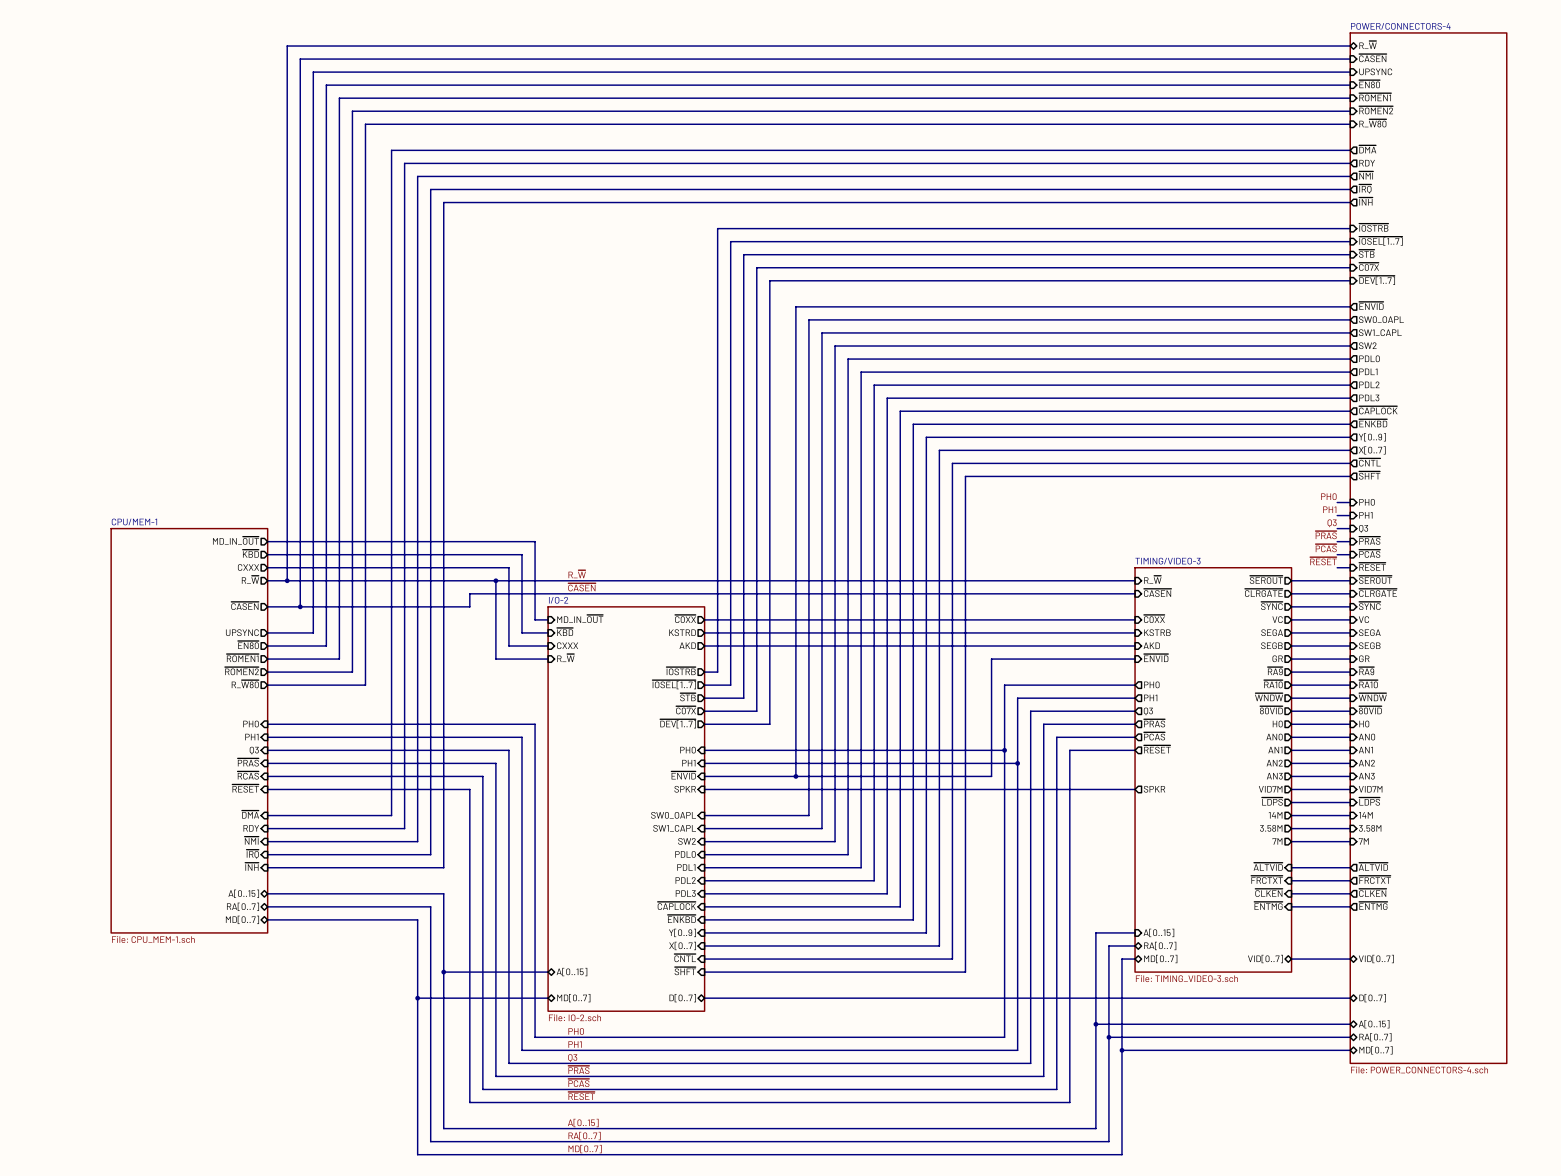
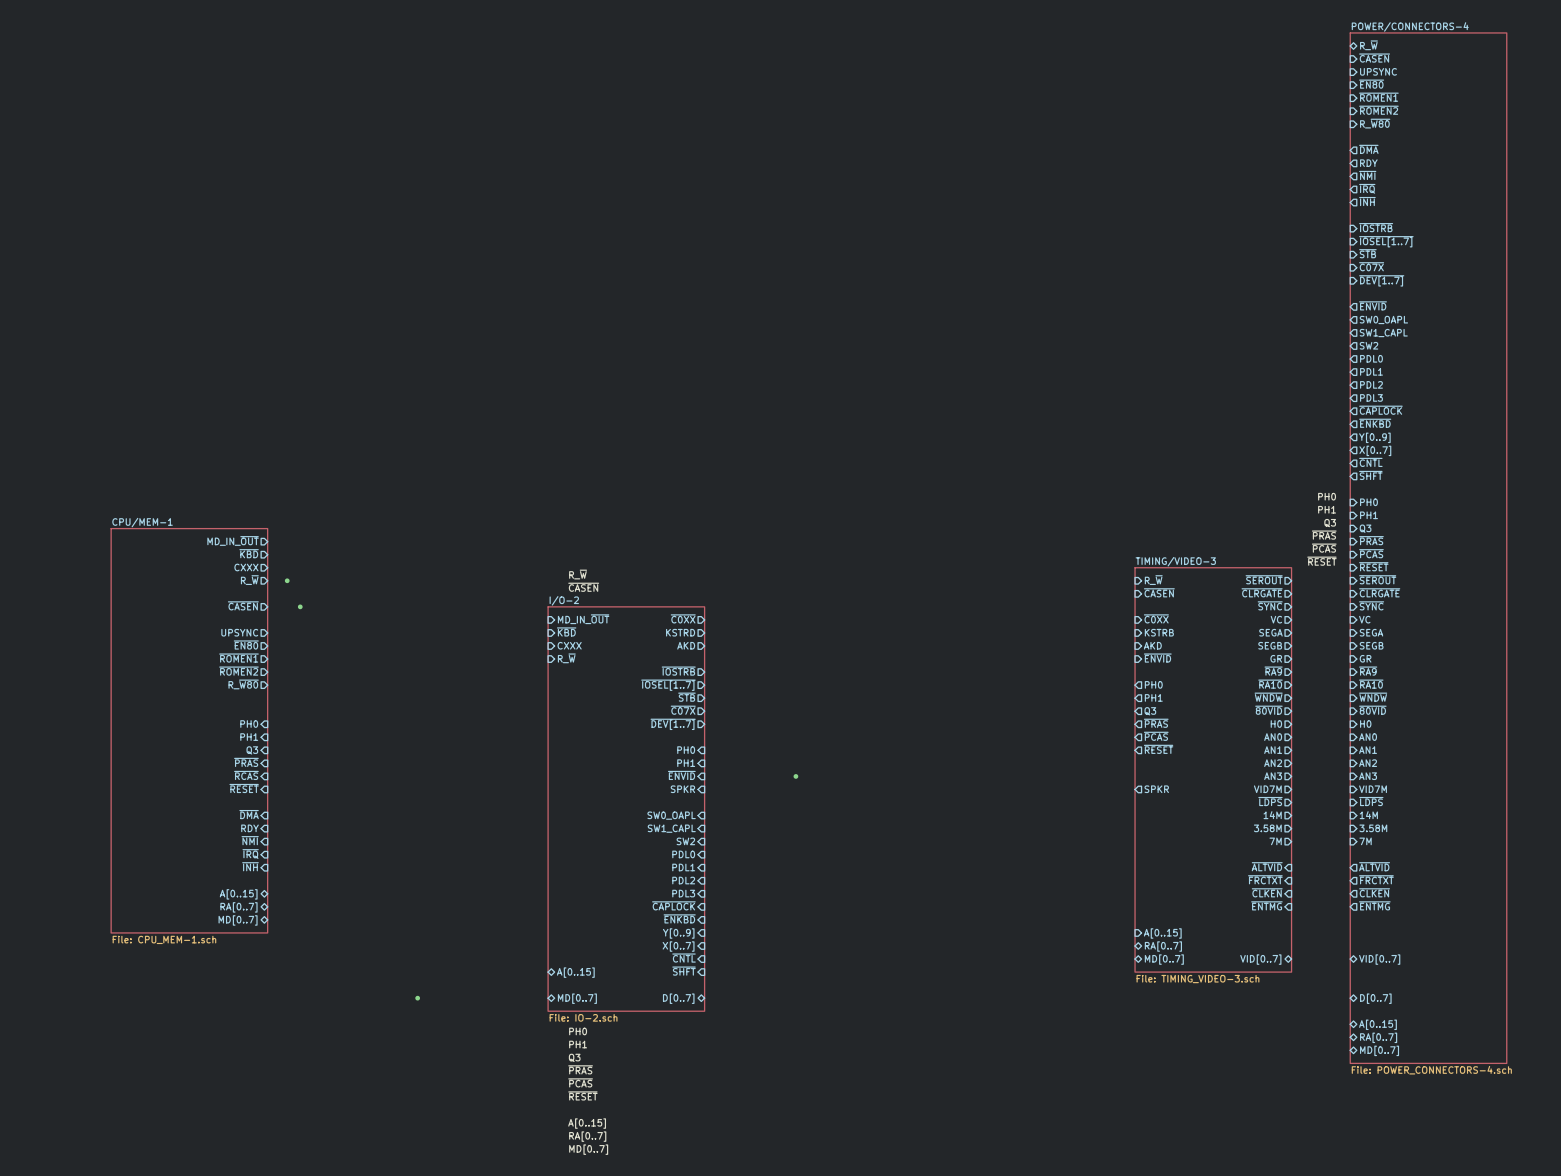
wire: (1350, 46) (287, 46) (287, 580) -> none
wire: (1350, 59) (300, 59) (300, 606) -> none
wire: (1350, 72) (313, 72) (313, 632) (267, 632) -> none
wire: (1350, 85) (326, 85) (326, 646) (267, 646) -> none
wire: (1350, 98) (339, 98) (339, 659) (267, 659) -> none
wire: (1350, 111) (352, 111) (352, 672) (267, 672) -> none
wire: (1350, 124) (365, 124) (365, 685) (267, 685) -> none
wire: (1350, 150) (391, 150) (391, 815) (267, 815) -> none
wire: (1350, 163) (404, 163) (404, 828) (267, 828) -> none
wire: (1350, 176) (417, 176) (417, 841) (267, 841) -> none
wire: (1350, 189) (430, 189) (430, 854) (267, 854) -> none
wire: (1350, 202) (443, 202) (443, 867) (267, 867) -> none
wire: (1350, 228) (717, 228) (717, 672) (704, 672) -> none
bus: (1350, 241) (730, 241) (730, 685) (704, 685) -> none
wire: (1350, 254) (743, 254) (743, 698) (704, 698) -> none
wire: (1350, 267) (756, 267) (756, 711) (704, 711) -> none
bus: (1350, 280) (769, 280) (769, 724) (704, 724) -> none
wire: (1350, 306) (795, 306) (795, 776) -> none
wire: (1350, 319) (808, 319) (808, 815) (704, 815) -> none
wire: (1350, 332) (821, 332) (821, 828) (704, 828) -> none
wire: (1350, 346) (835, 346) (835, 841) (704, 841) -> none
wire: (1350, 359) (848, 359) (848, 854) (704, 854) -> none
wire: (1350, 372) (861, 372) (861, 867) (704, 867) -> none
wire: (1350, 385) (874, 385) (874, 880) (704, 880) -> none
wire: (1350, 398) (887, 398) (887, 893) (704, 893) -> none
wire: (1350, 411) (900, 411) (900, 906) (704, 906) -> none
wire: (1350, 424) (913, 424) (913, 919) (704, 919) -> none
bus: (1350, 437) (926, 437) (926, 932) (704, 932) -> none
bus: (1350, 450) (939, 450) (939, 945) (704, 945) -> none
wire: (1350, 463) (952, 463) (952, 959) (704, 959) -> none
wire: (1350, 476) (965, 476) (965, 972) (704, 972) -> none
wire: (1337, 502) (1350, 502) -> none
wire: (1337, 515) (1350, 515) -> none
wire: (1337, 528) (1350, 528) -> none
wire: (267, 541) (535, 541) (535, 619) (548, 619) -> none
wire: (1337, 541) (1350, 541) -> none
wire: (267, 554) (522, 554) (522, 632) (548, 632) -> none
wire: (1337, 554) (1350, 554) -> none
wire: (267, 567) (508, 567) (508, 646) (548, 646) -> none
wire: (1337, 567) (1350, 567) -> none
wire: (267, 580) (1135, 580) -> none
wire: (495, 580) (495, 659) (548, 659) -> none
junction: (495, 580) -> none
wire: (1291, 580) (1350, 580) -> none
wire: (1135, 593) (469, 593) (469, 606) (267, 606) -> none
wire: (1291, 593) (1350, 593) -> none
wire: (1291, 606) (1350, 606) -> none
wire: (704, 619) (1135, 619) -> none
wire: (1291, 619) (1350, 619) -> none
wire: (704, 632) (1135, 632) -> none
wire: (1291, 632) (1350, 632) -> none
wire: (704, 646) (1135, 646) -> none
wire: (1291, 646) (1350, 646) -> none
wire: (1135, 659) (991, 659) (991, 776) (704, 776) -> none
wire: (1291, 659) (1350, 659) -> none
wire: (1291, 672) (1350, 672) -> none
wire: (1135, 685) (1004, 685) (1004, 1037) (535, 1037) (535, 724) (267, 724) -> none
wire: (1291, 685) (1350, 685) -> none
wire: (1135, 698) (1017, 698) (1017, 1050) (522, 1050) (522, 737) (267, 737) -> none
wire: (1291, 698) (1350, 698) -> none
wire: (1135, 711) (1030, 711) (1030, 1063) (508, 1063) (508, 750) (267, 750) -> none
wire: (1291, 711) (1350, 711) -> none
wire: (1135, 724) (1043, 724) (1043, 1076) (495, 1076) (495, 763) (267, 763) -> none
wire: (1291, 724) (1350, 724) -> none
wire: (1135, 737) (1056, 737) (1056, 1089) (482, 1089) (482, 776) (267, 776) -> none
wire: (1291, 737) (1350, 737) -> none
wire: (704, 750) (1004, 750) -> none
junction: (1004, 750) -> none
wire: (1135, 750) (1069, 750) (1069, 1102) (469, 1102) (469, 789) (267, 789) -> none
wire: (1291, 750) (1350, 750) -> none
wire: (704, 763) (1017, 763) -> none
junction: (1017, 763) -> none
wire: (1291, 763) (1350, 763) -> none
wire: (1291, 776) (1350, 776) -> none
wire: (704, 789) (1135, 789) -> none
wire: (1291, 789) (1350, 789) -> none
wire: (1291, 802) (1350, 802) -> none
wire: (1291, 815) (1350, 815) -> none
wire: (1291, 828) (1350, 828) -> none
wire: (1291, 841) (1350, 841) -> none
wire: (1291, 867) (1350, 867) -> none
wire: (1291, 880) (1350, 880) -> none
bus: (267, 893) (443, 893) (443, 1128) (1095, 1128) (1095, 932) (1135, 932) -> none
wire: (1291, 893) (1350, 893) -> none
bus: (267, 906) (430, 906) (430, 1141) (1108, 1141) (1108, 945) (1135, 945) -> none
wire: (1291, 906) (1350, 906) -> none
bus: (267, 919) (417, 919) (417, 1154) (1121, 1154) (1121, 959) (1135, 959) -> none
bus: (1291, 959) (1350, 959) -> none
bus: (443, 972) (548, 972) -> none
junction: (443, 972) -> none
bus: (417, 998) (548, 998) -> none
bus: (704, 998) (1350, 998) -> none
bus: (1095, 1024) (1350, 1024) -> none
junction: (1095, 1024) -> none
bus: (1108, 1037) (1350, 1037) -> none
junction: (1108, 1037) -> none
bus: (1121, 1050) (1350, 1050) -> none
junction: (1121, 1050) -> none

